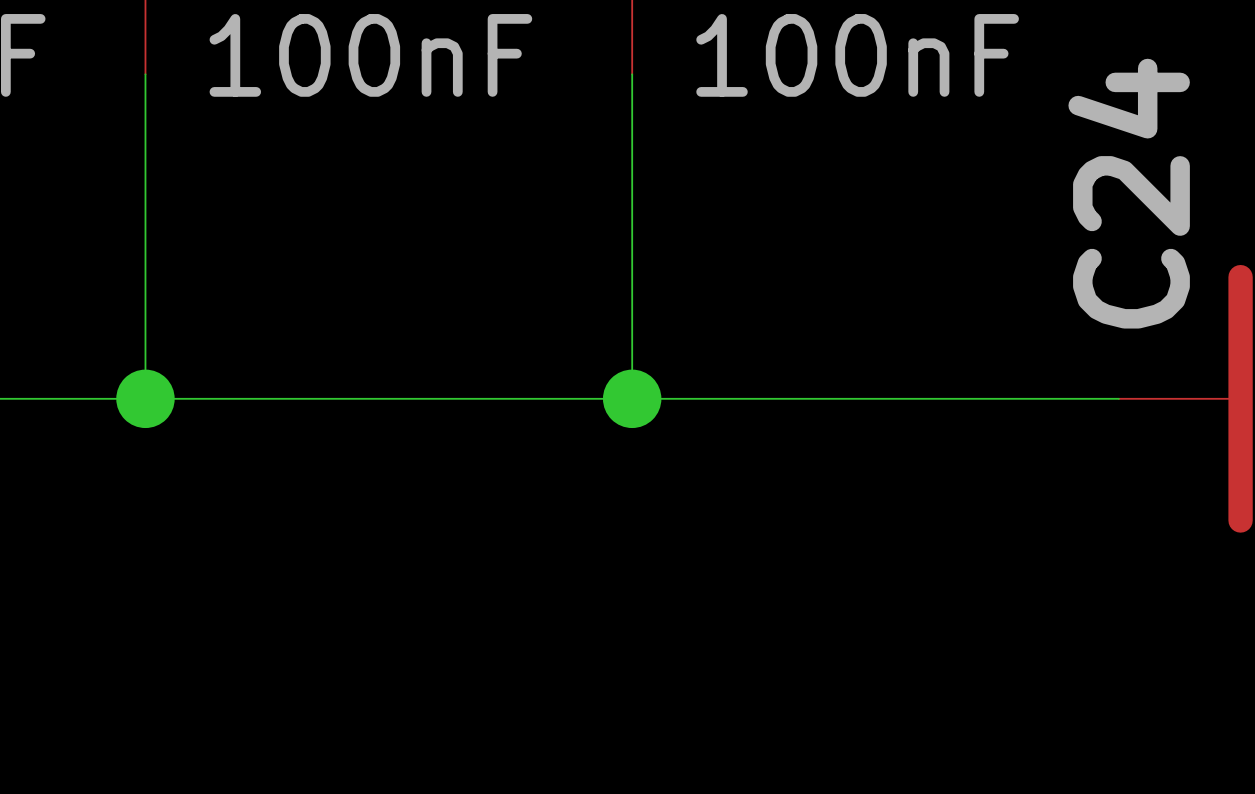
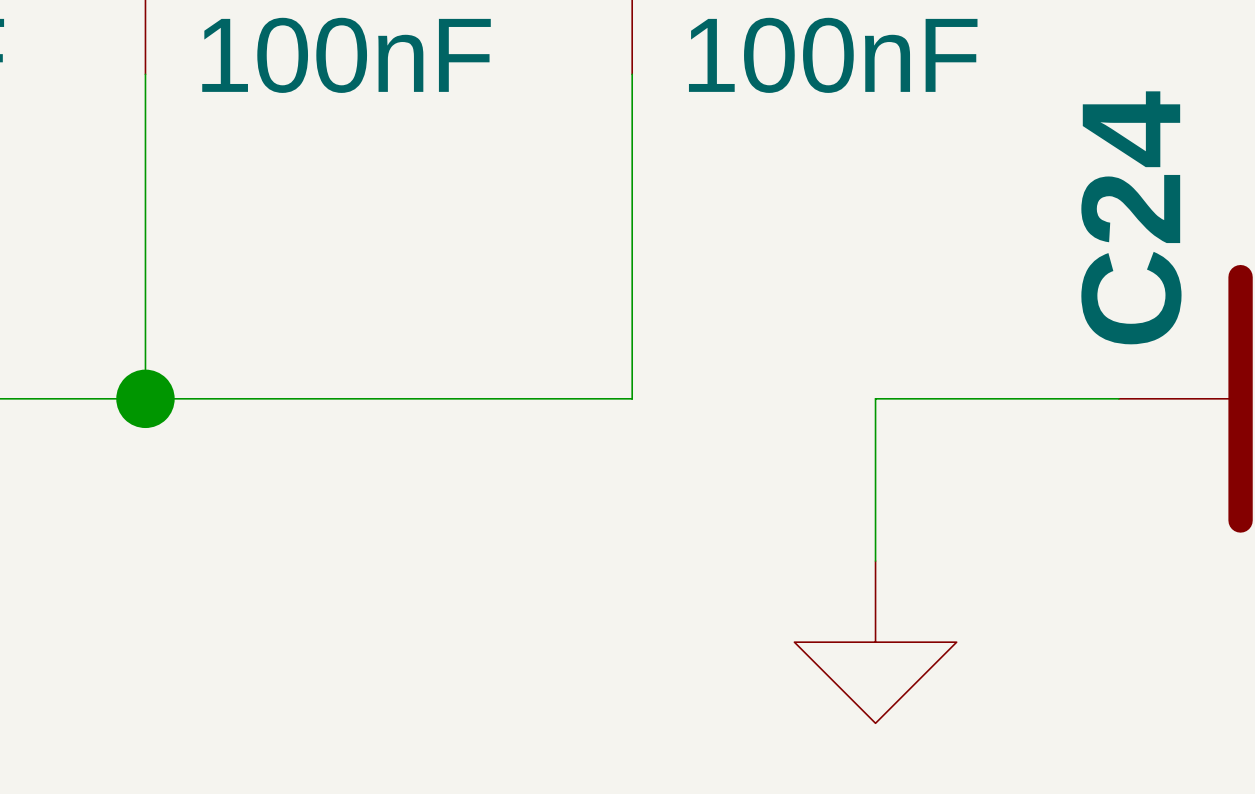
wire: (632, 398) (875, 398) -> (875, 561) (875, 398)
junction: (632, 398) -> none
power symbol: none -> (875, 642)

